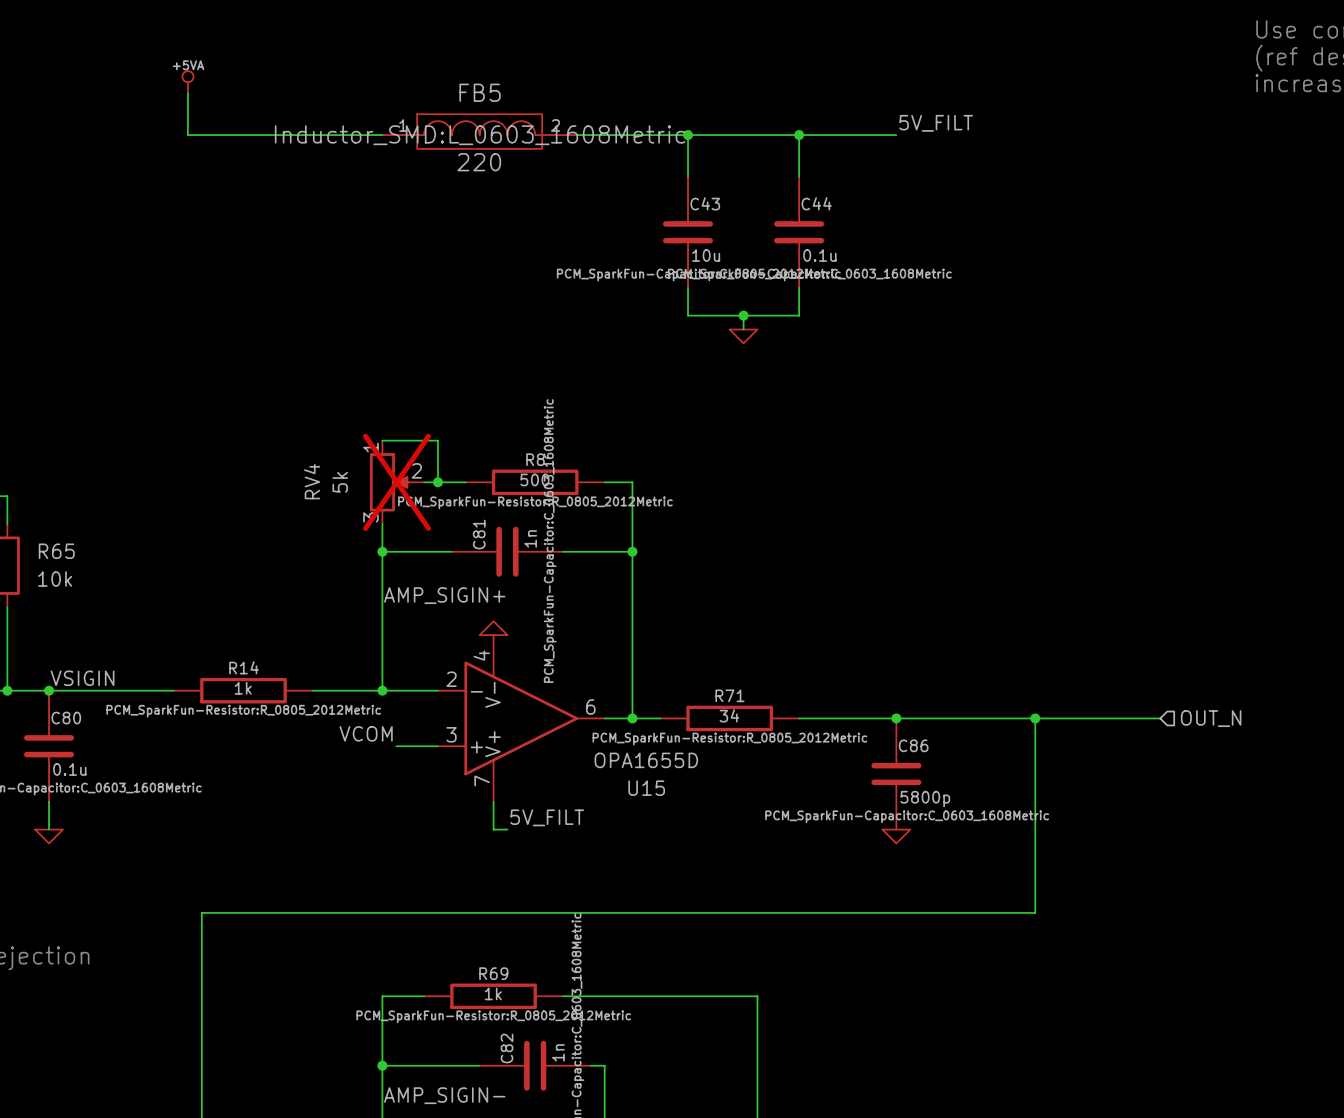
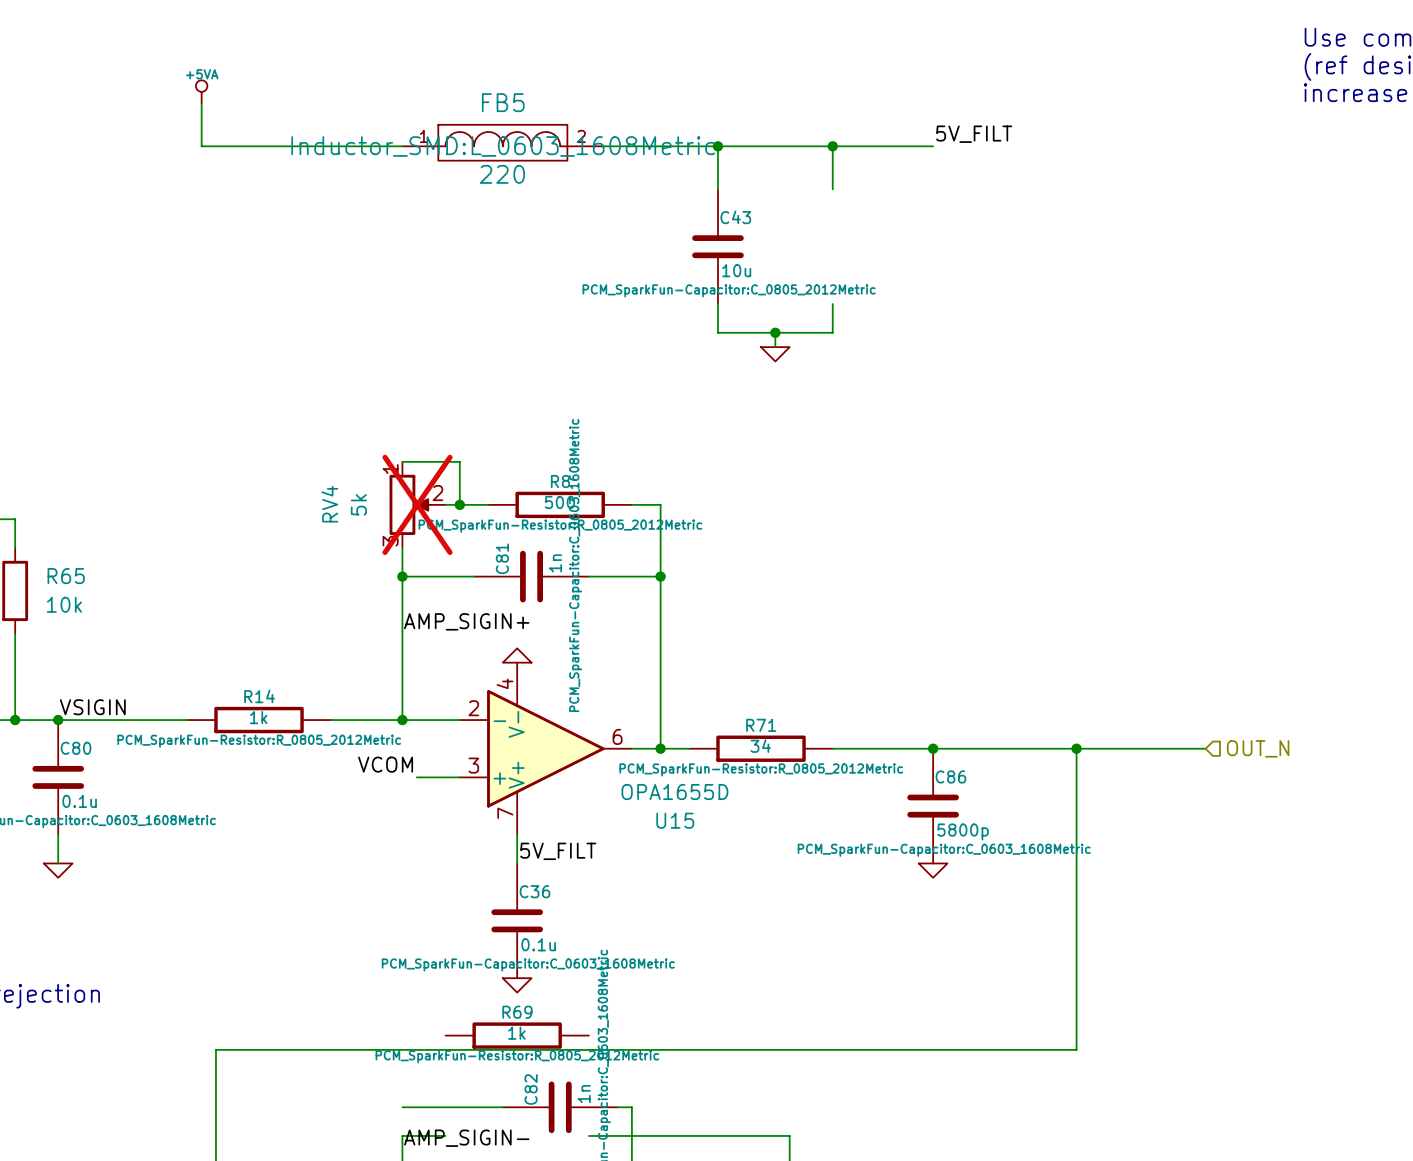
C44: 0.1u (799, 232) -> none
label position: 5V_FILT (547, 817) -> 5V_FILT (558, 851)
wire: (493, 829) (507, 829) -> none
C36: none -> 0.1u (517, 920)
wire: (1035, 912) (201, 912) (201, 1010) -> (1076, 949) (1076, 1049) (215, 1049)
power symbol: none -> (517, 985)
wire: (424, 996) (382, 996) (382, 1093) -> (445, 1135) (402, 1135)
wire: (563, 996) (757, 996) (757, 1093) -> (588, 1135) (789, 1135)
junction: (382, 1065) -> none

